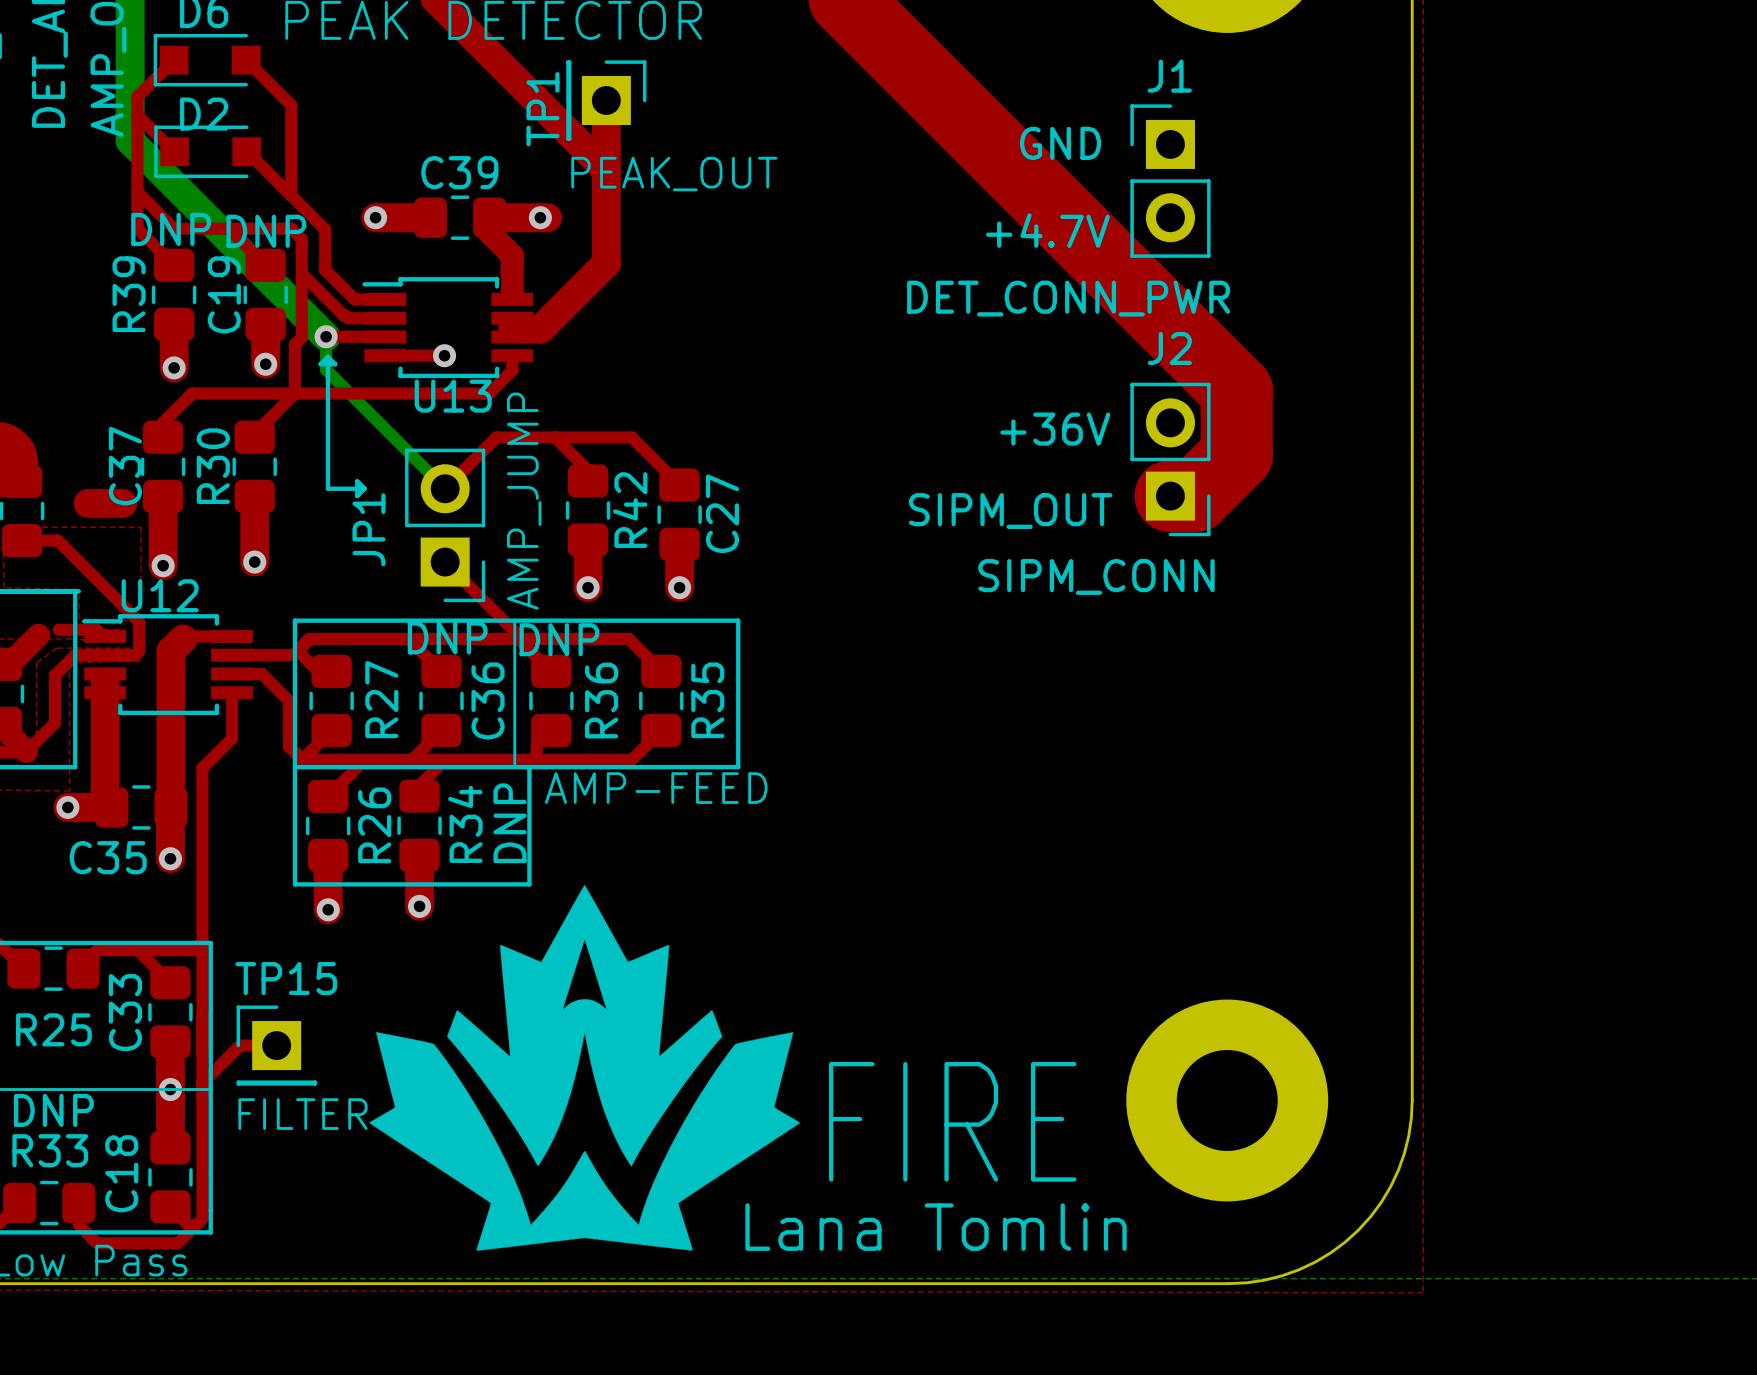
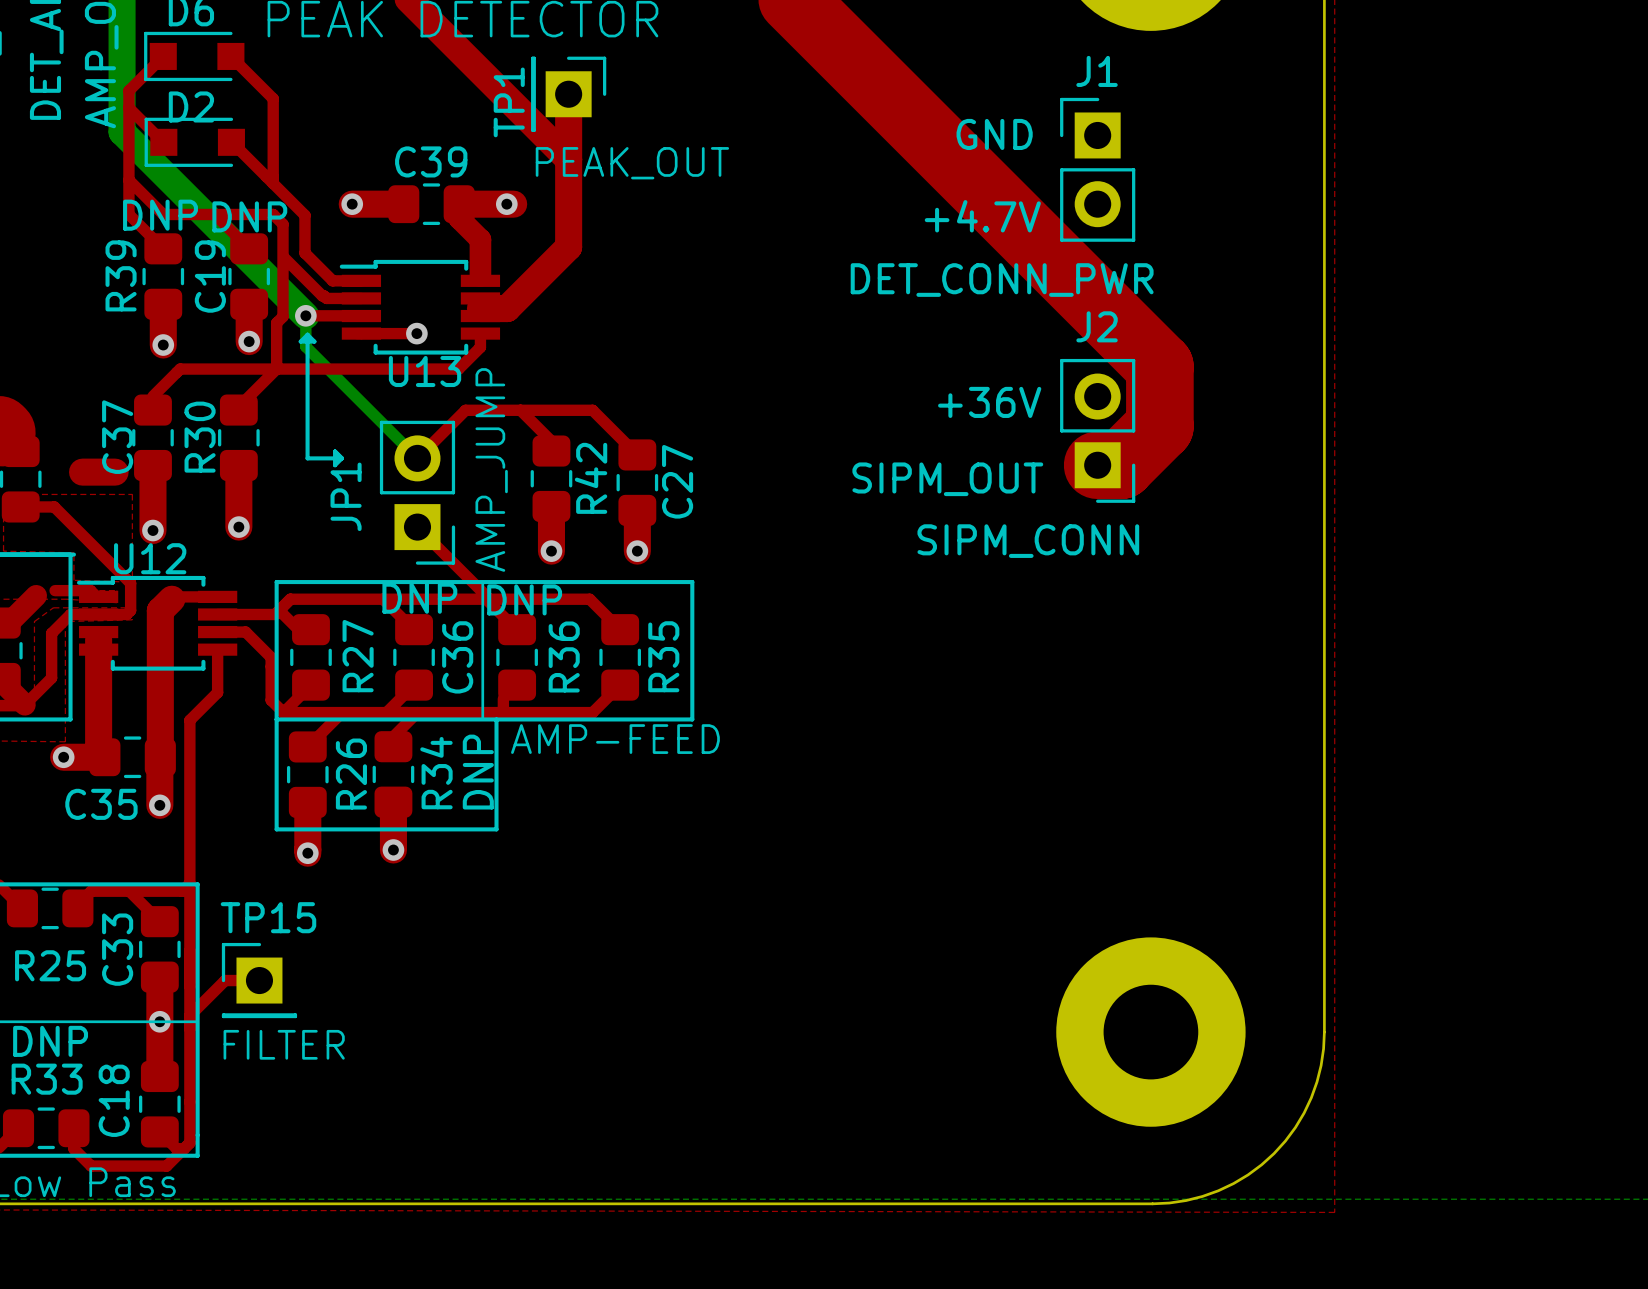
drawing: [369, 885, 801, 1251] -> none
text: FIRE (952, 1121) -> none
text: Lana Tomlin (936, 1227) -> none

